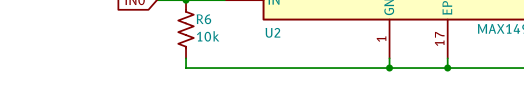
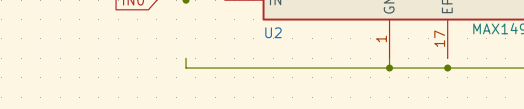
wire: (156, 0) (224, 0) -> none
R6: 10k (186, 29) -> none
wire: (447, 58) (447, 68) -> none

